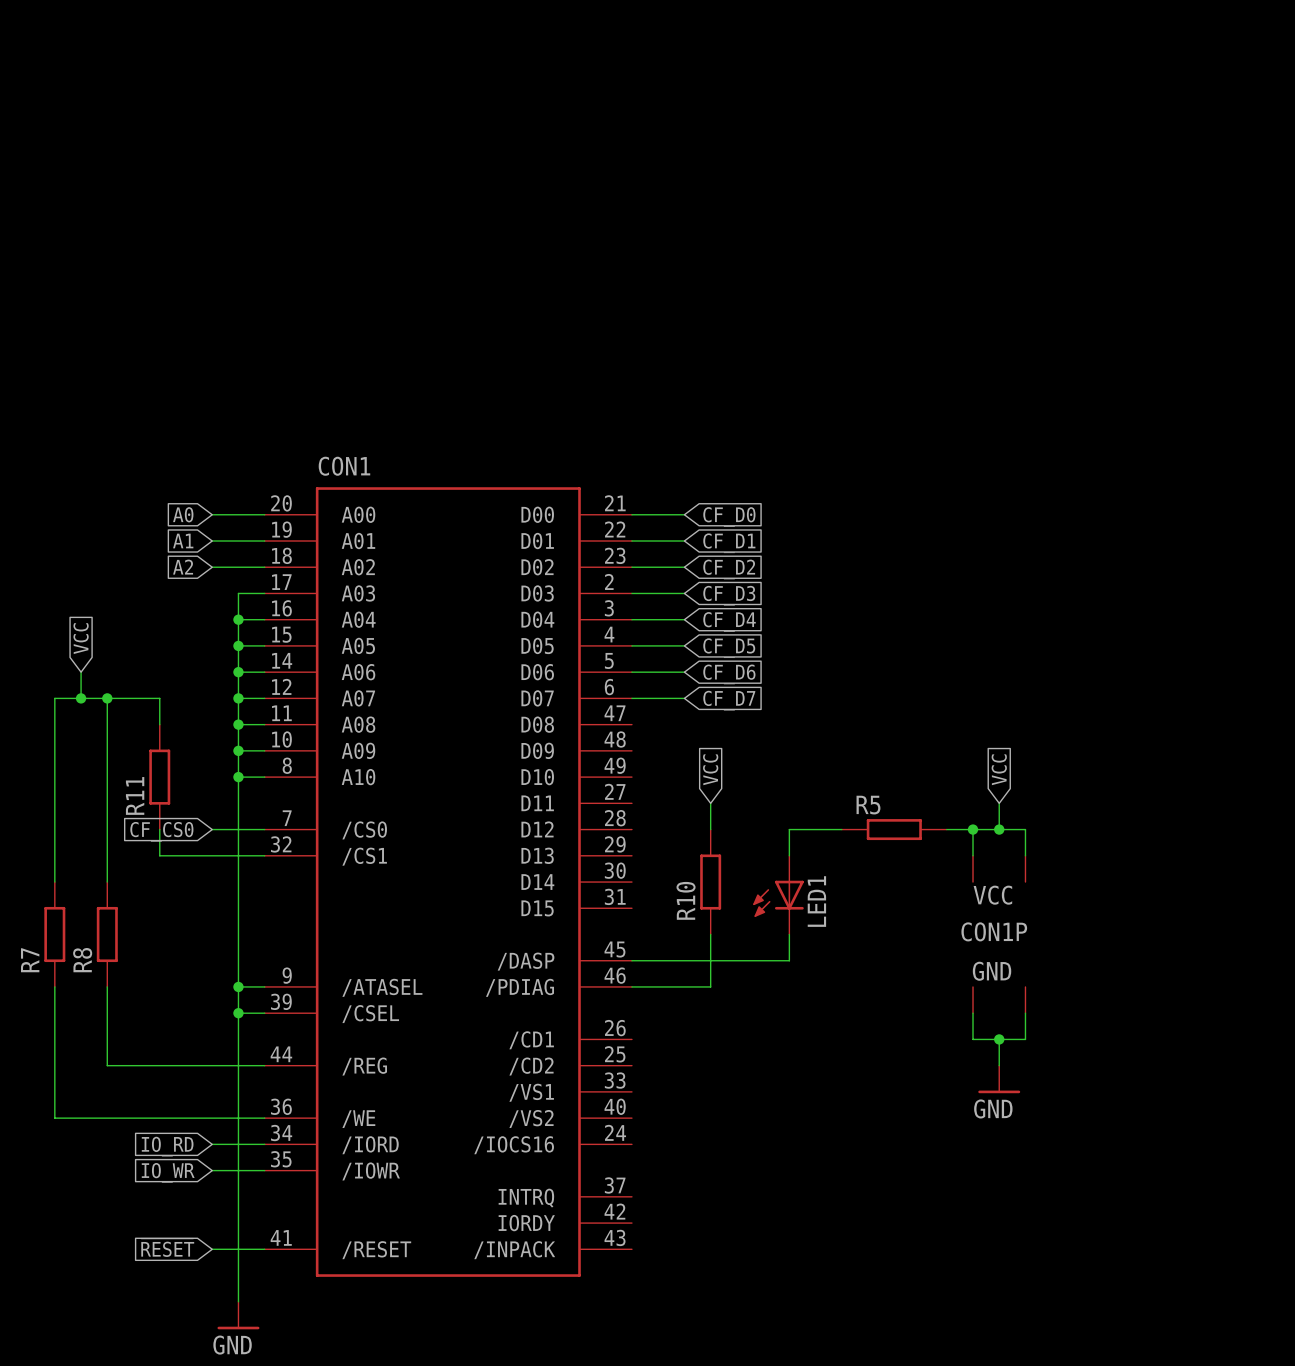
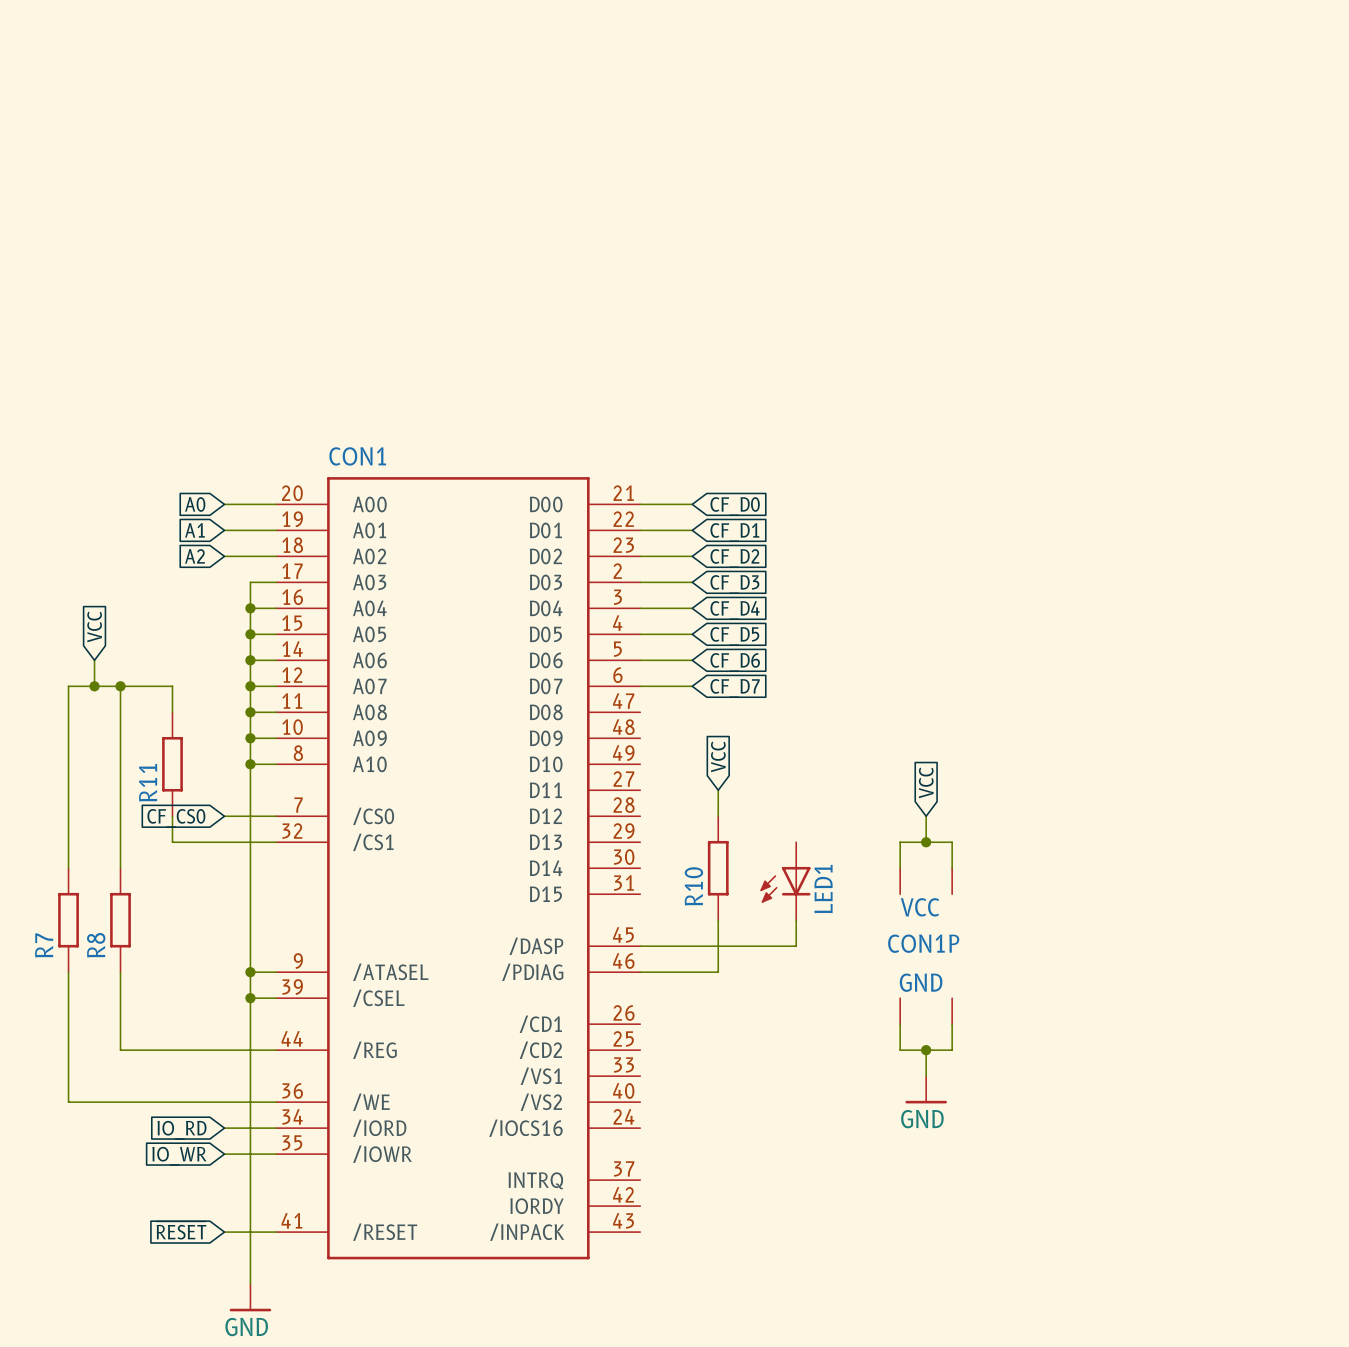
global label position: VCC (999, 769) -> VCC (926, 782)
wire: (999, 803) (999, 829) -> (926, 816) (926, 842)
wire: (841, 829) (789, 829) (789, 855) -> none
R5: (894, 829) -> none
wire: (946, 829) (1025, 829) (1025, 855) -> none
wire: (973, 829) (973, 855) -> none
junction: (973, 829) -> none
junction: (999, 829) -> none
junction: none -> (926, 842)
wire: none -> (900, 868) (900, 842) (952, 842) (952, 868)
CON1P position: (999, 934) -> (926, 946)
wire: (973, 1013) (973, 1039) (1025, 1039) (1025, 1013) -> (900, 1024) (900, 1050) (952, 1050) (952, 1024)
wire: (999, 1039) (999, 1065) -> (926, 1050) (926, 1076)
junction: (999, 1039) -> none
junction: none -> (926, 1050)
power symbol position: GND (999, 1079) -> GND (926, 1089)

